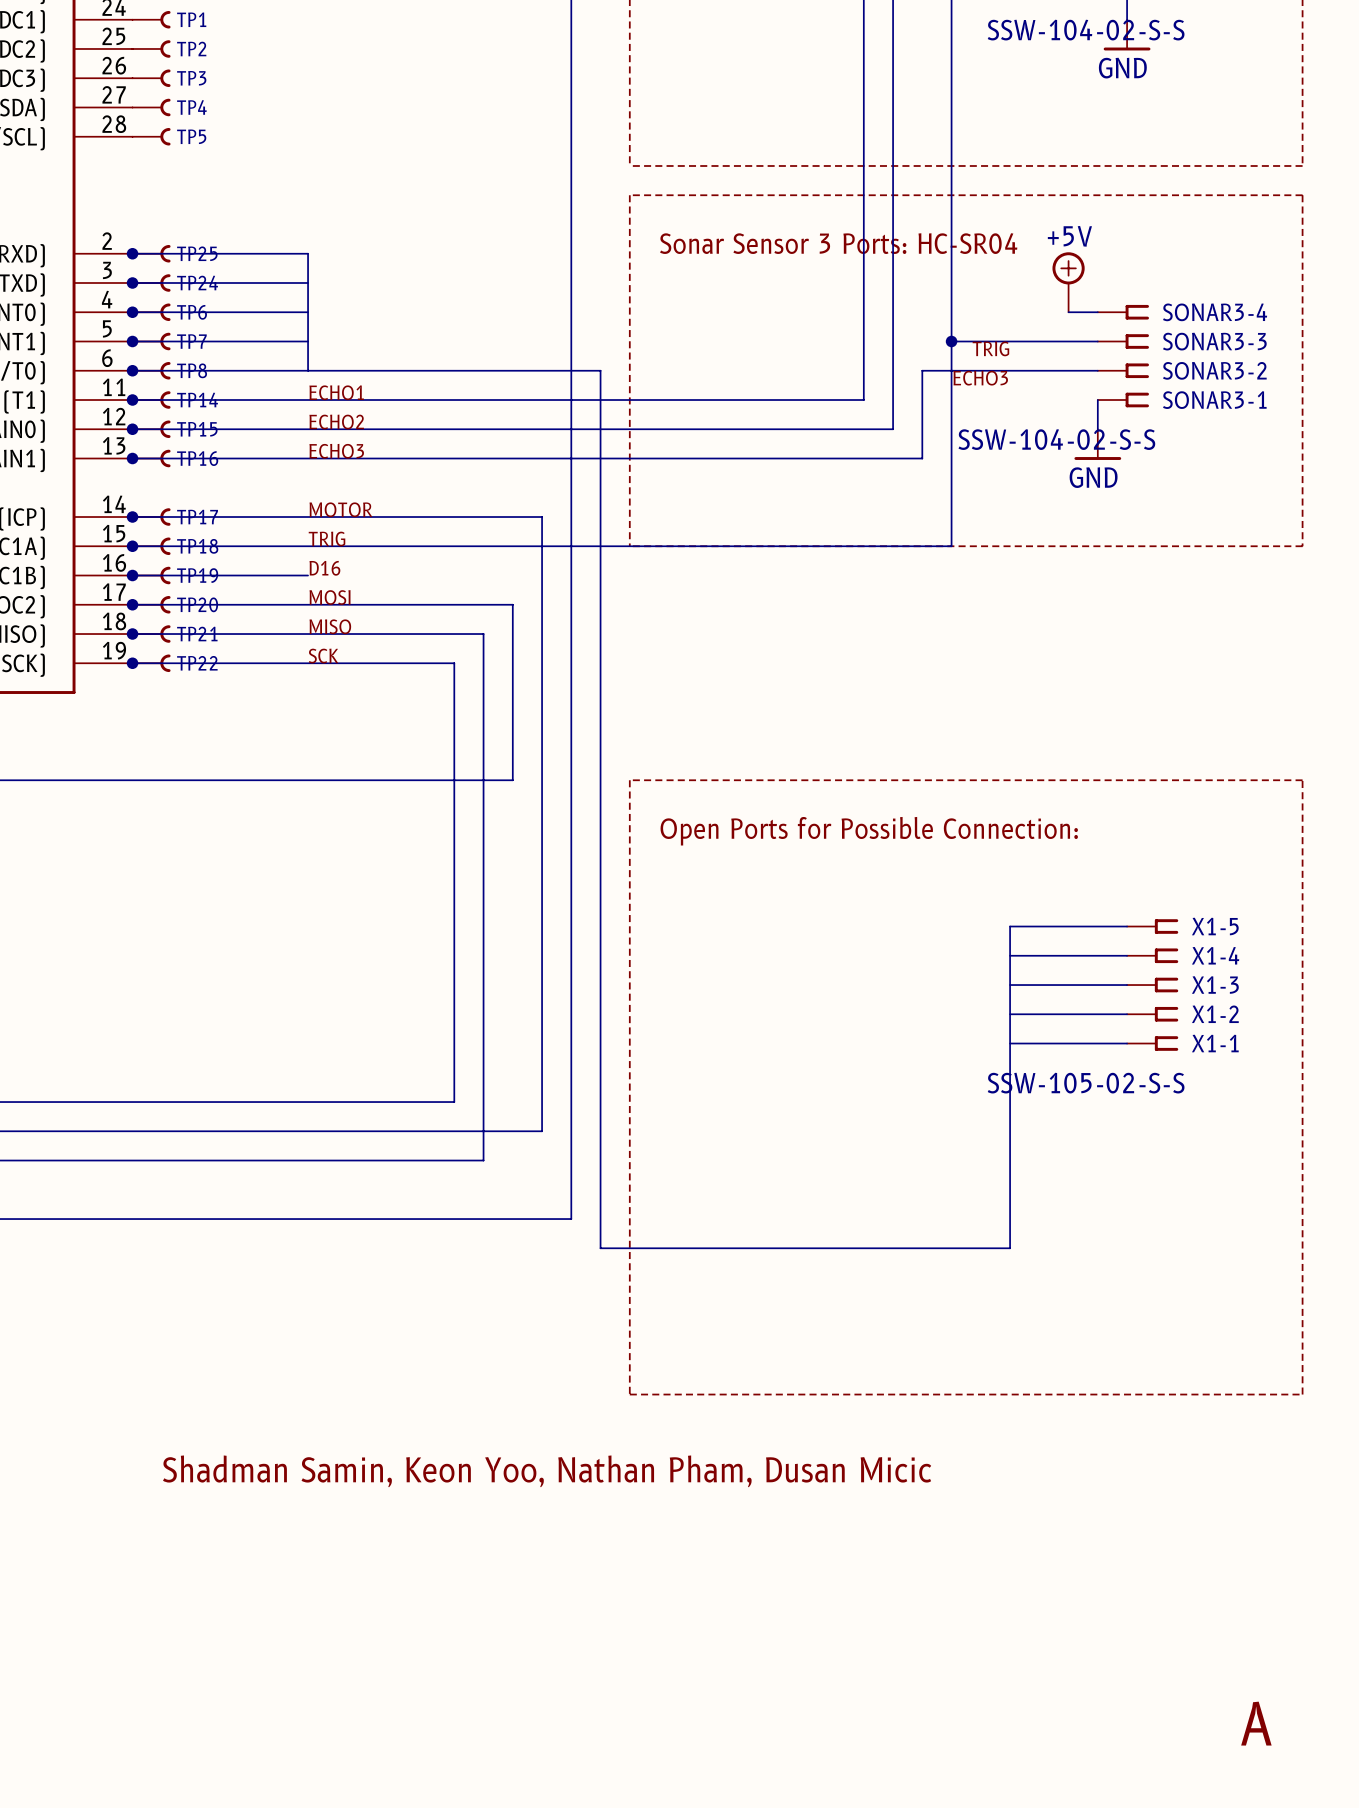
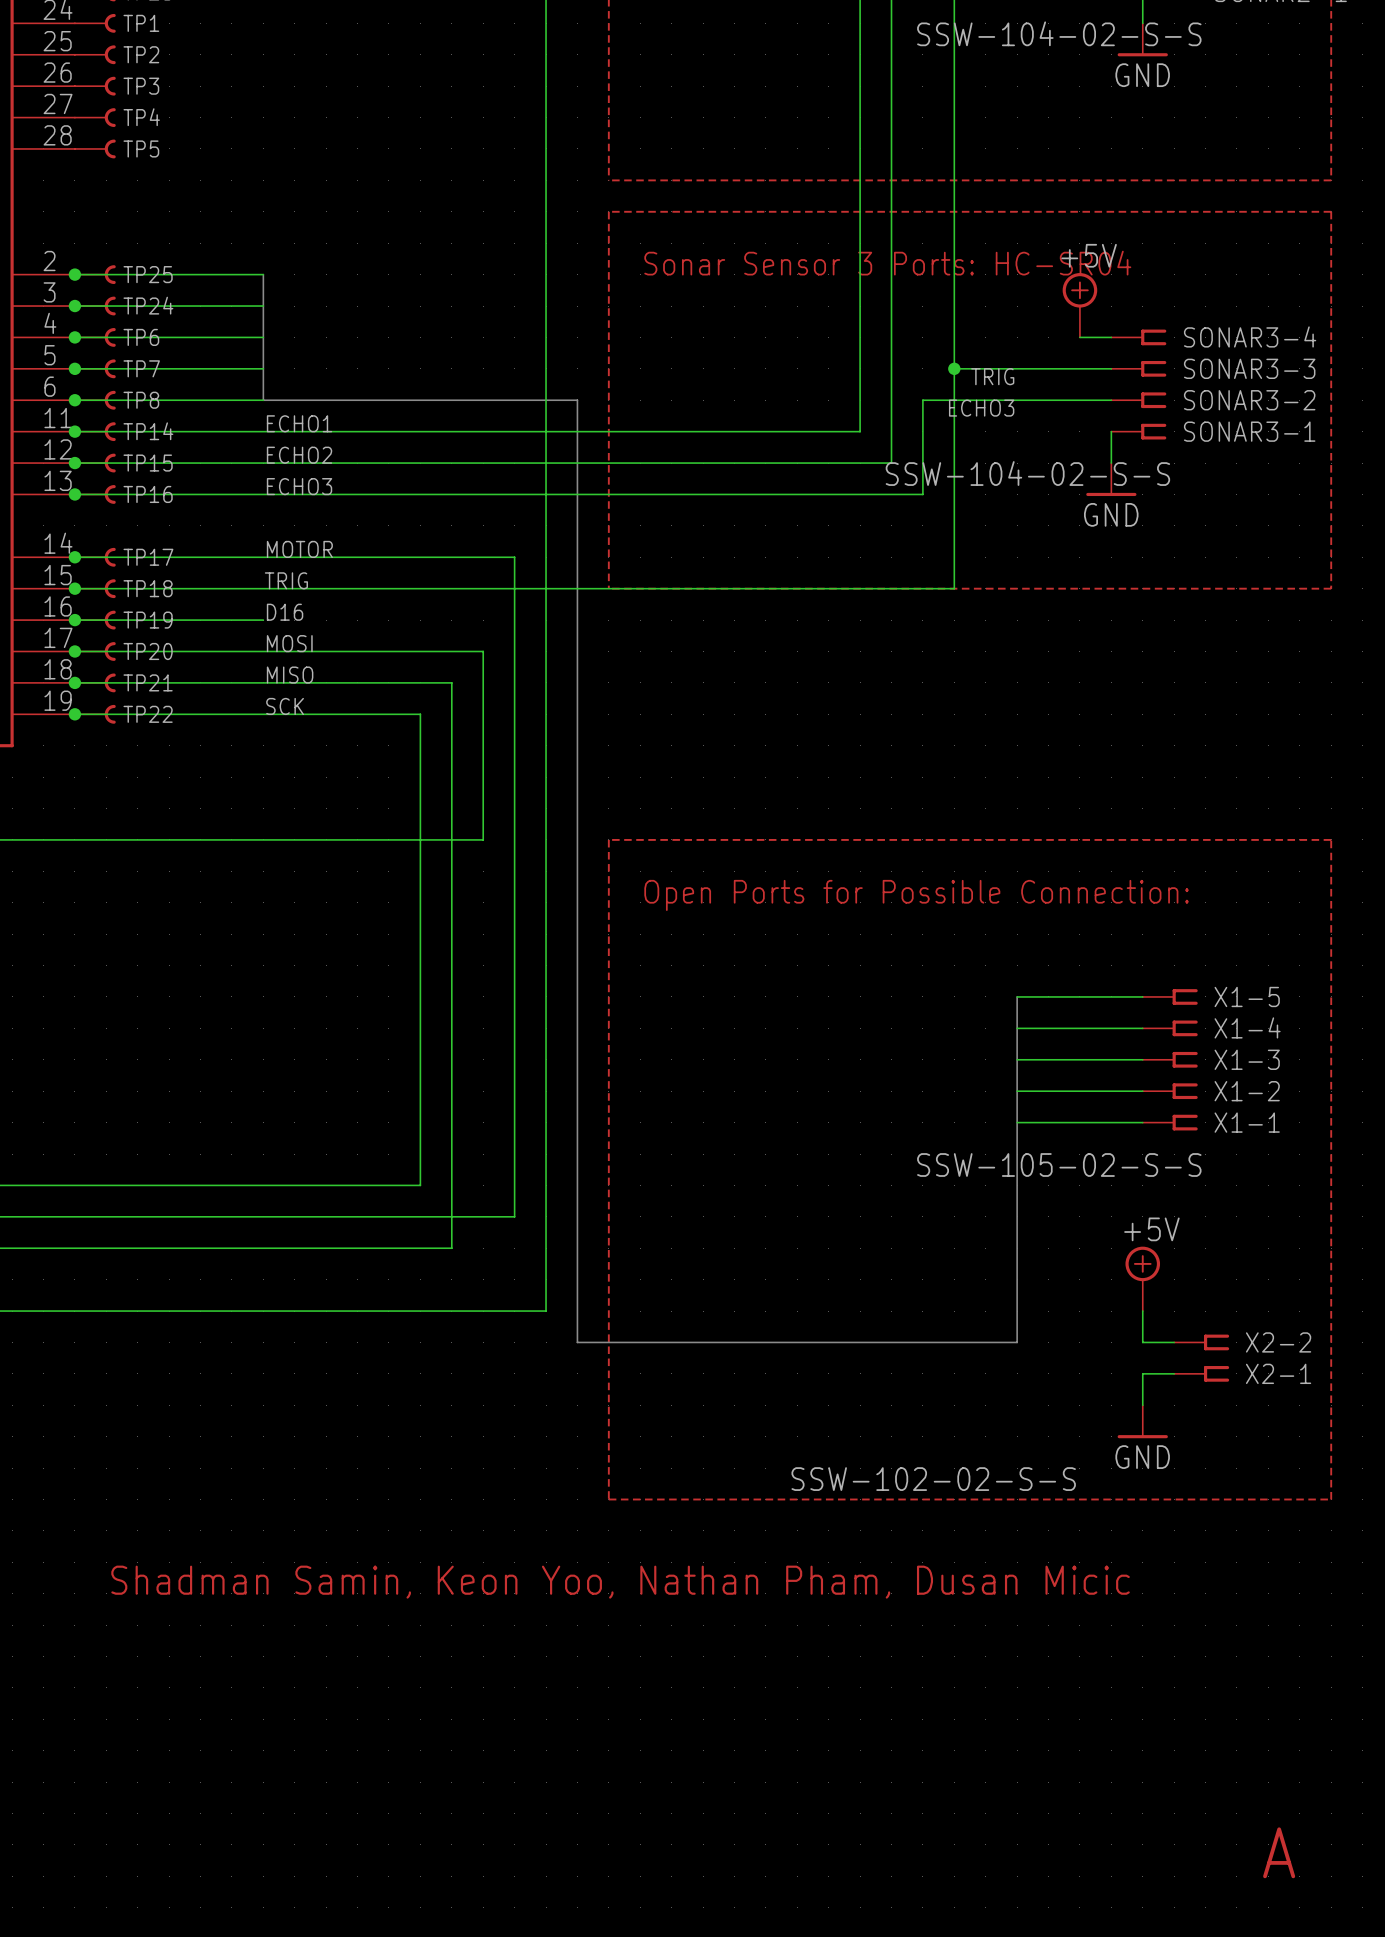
power symbol: none -> +5V (1142, 1278)
wire: none -> (1142, 1311) (1142, 1342) (1174, 1342)
X2-2: none -> (1201, 1342)
wire: none -> (1174, 1373) (1142, 1373) (1142, 1405)
X2-1: none -> SSW-102-02-S-S (1201, 1373)
power symbol: none -> GND (1142, 1421)

